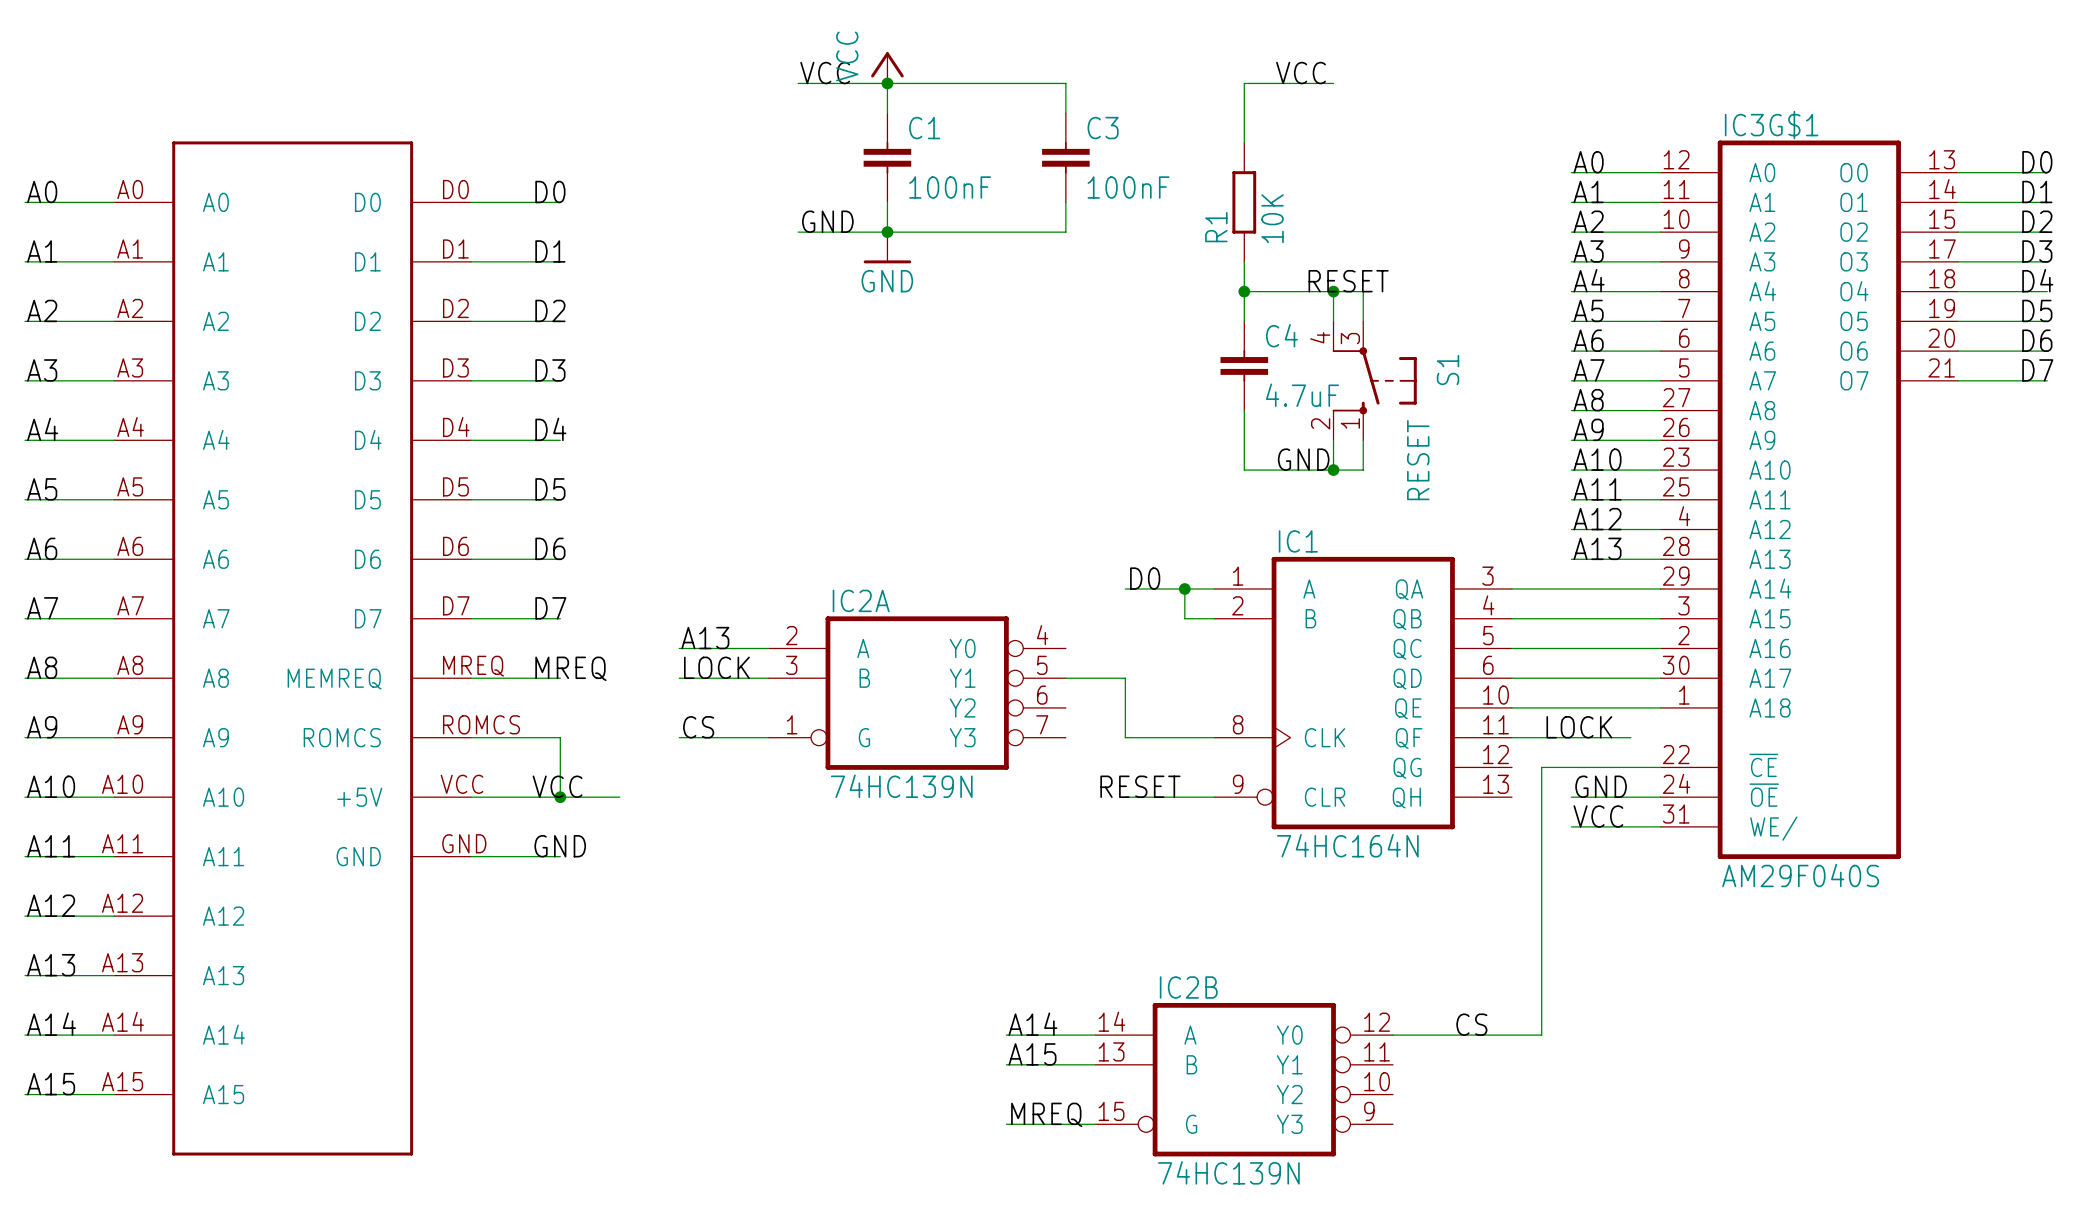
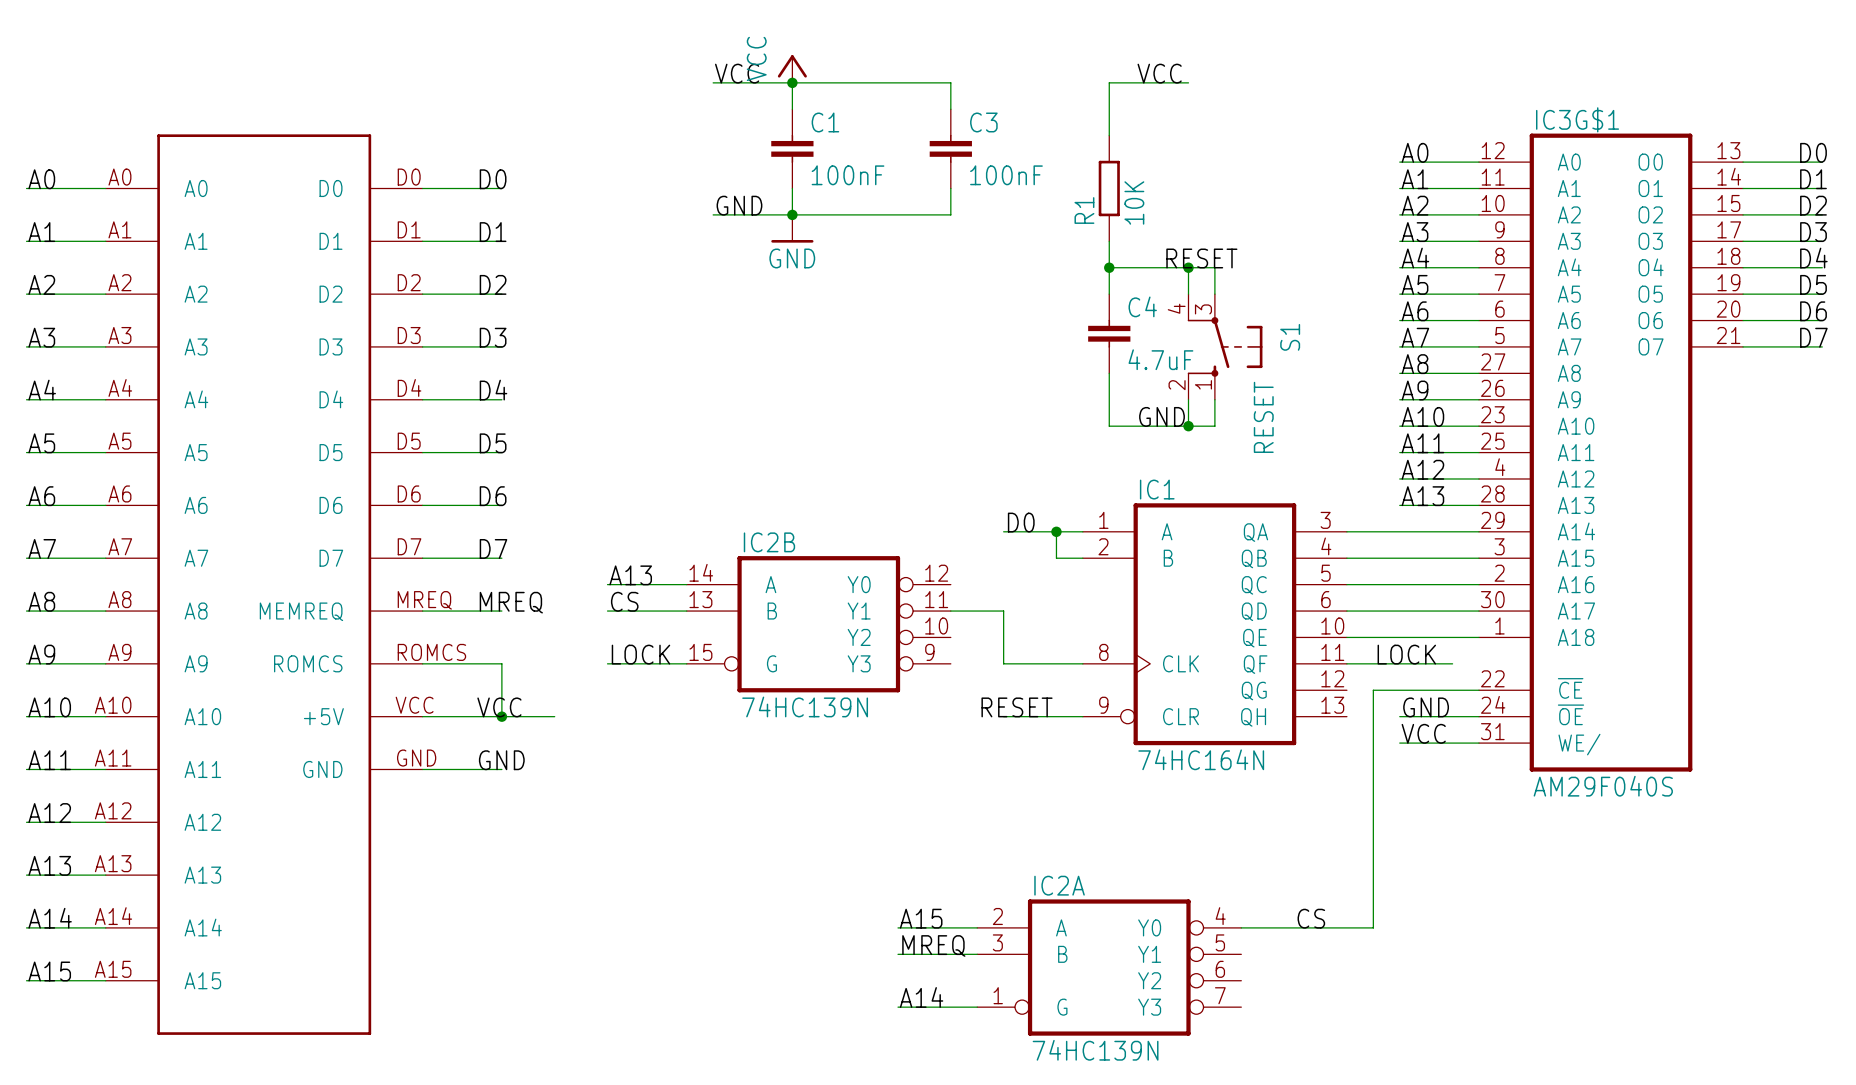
label: LOCK (716, 667) -> CS (624, 601)
IC2A position: (917, 693) -> (1109, 967)
label: CS (698, 727) -> LOCK (640, 654)
label: A14 (1032, 1024) -> A15 (921, 918)
label: A15 (1032, 1054) -> MREQ (933, 945)
IC2B position: (1244, 1079) -> (818, 624)
label: MREQ (1046, 1114) -> A14 (921, 997)

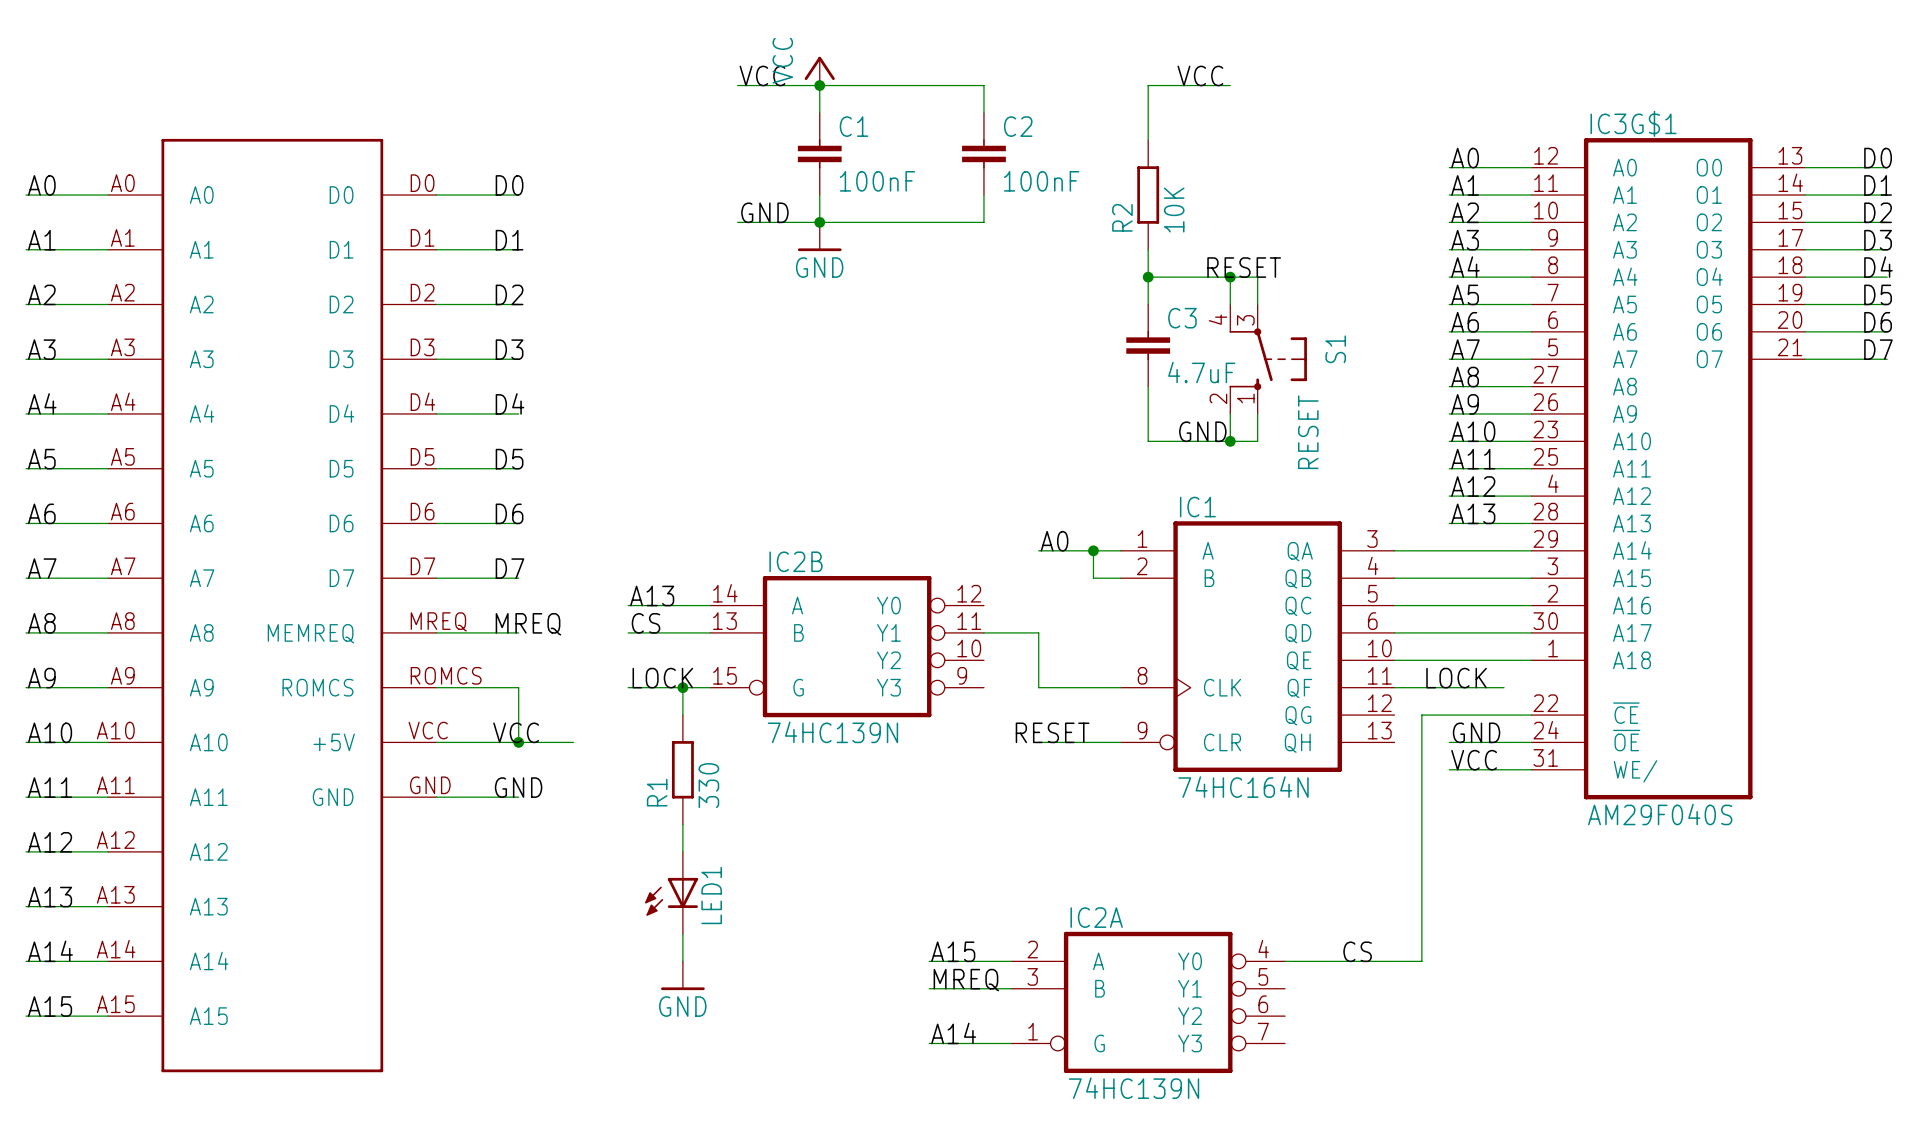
C3 name: C3 (983, 122) -> C2 (1018, 126)
R1 name: R1 (1084, 210) -> R2 (1122, 217)
C4 name: C4 (1142, 306) -> C3 (1182, 318)
label: D0 (1021, 522) -> A0 (1054, 541)
wire: none -> (682, 687) (682, 715)
junction: none -> (682, 687)
R1: none -> 330 (682, 769)
wire: none -> (682, 824) (682, 851)
LED1: none -> (671, 892)
wire: none -> (682, 934) (682, 961)
power symbol: none -> GND (682, 975)

